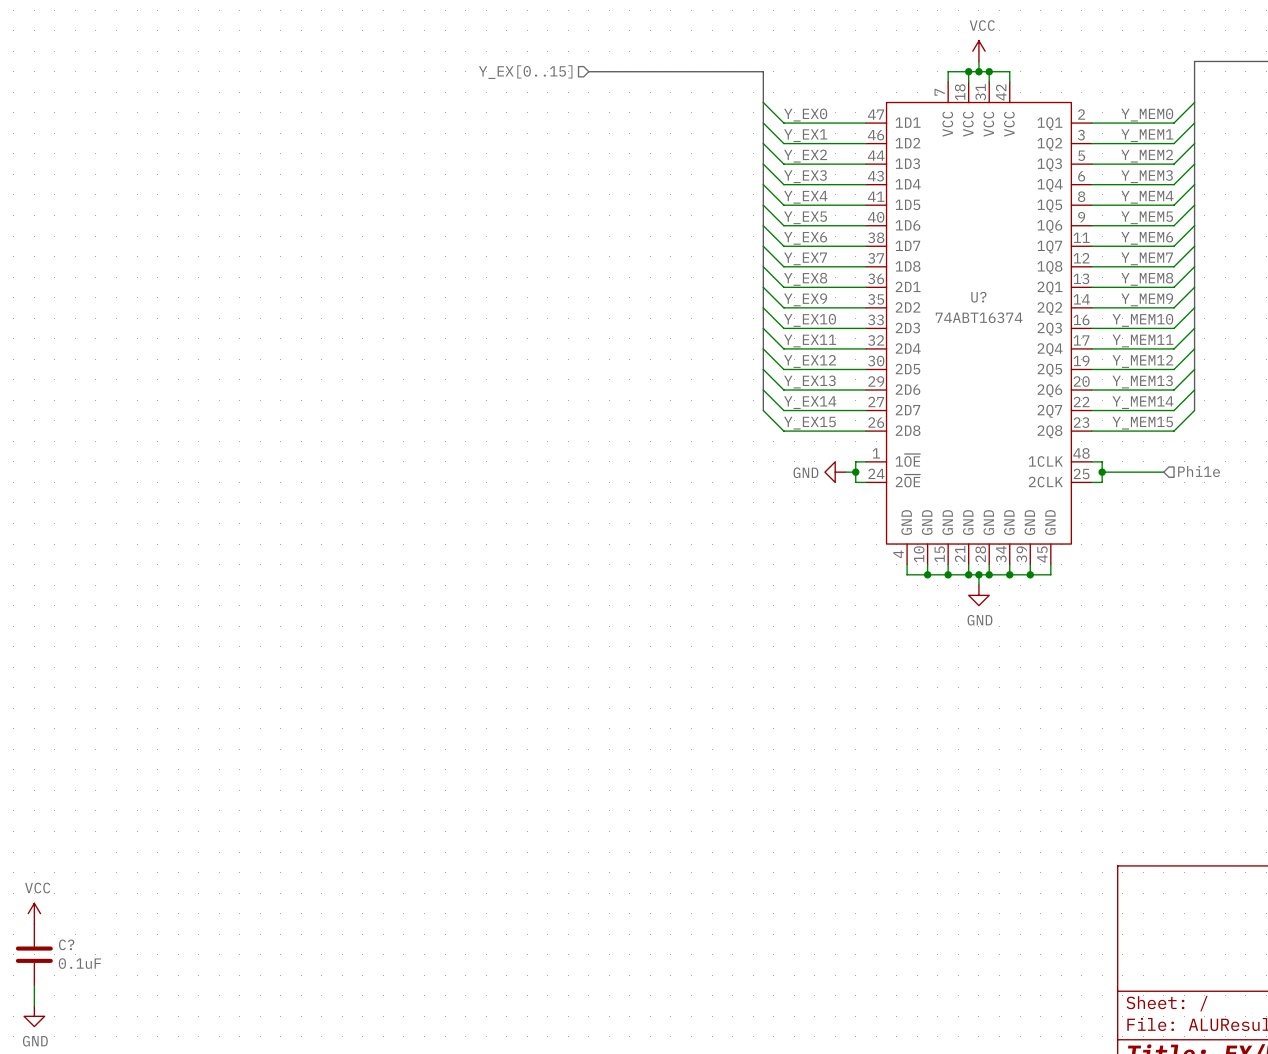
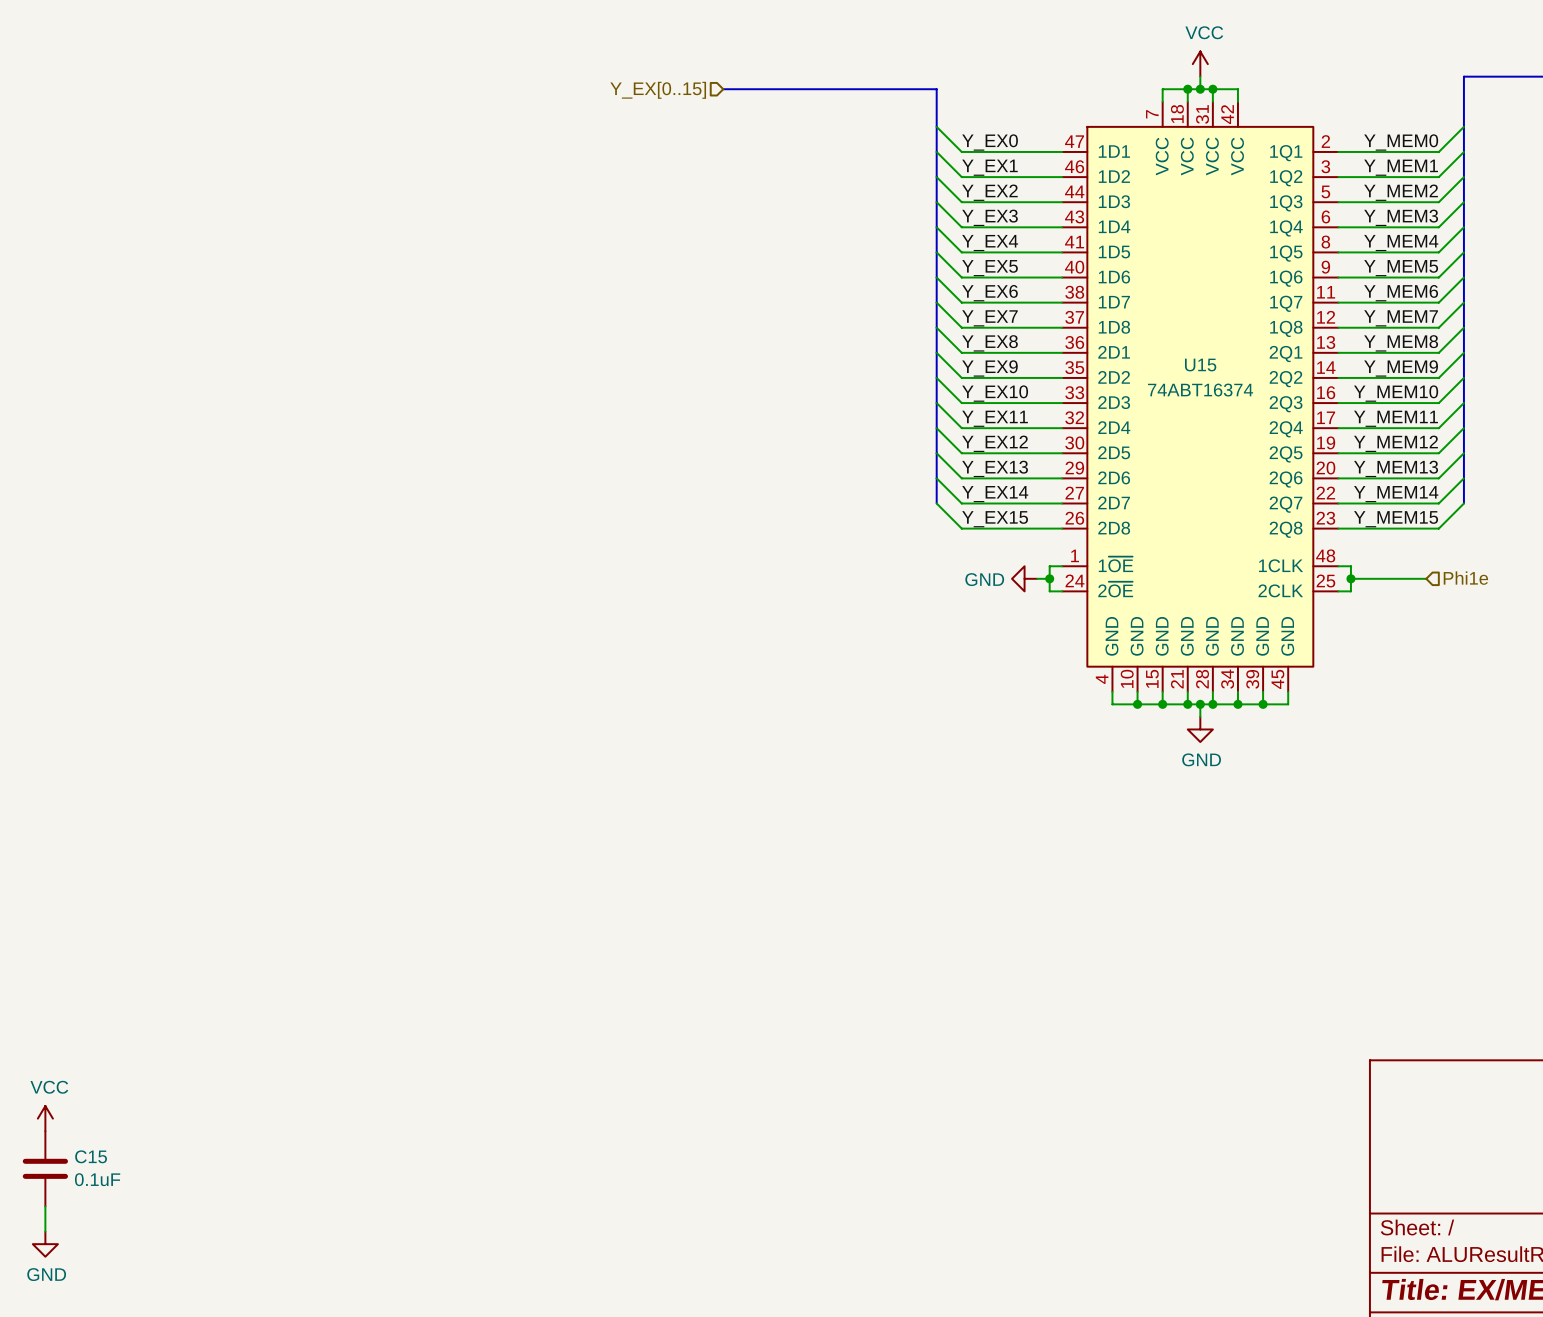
U? name: U? (978, 297) -> U15 (1200, 365)
C? name: C? (66, 944) -> C15 (91, 1156)

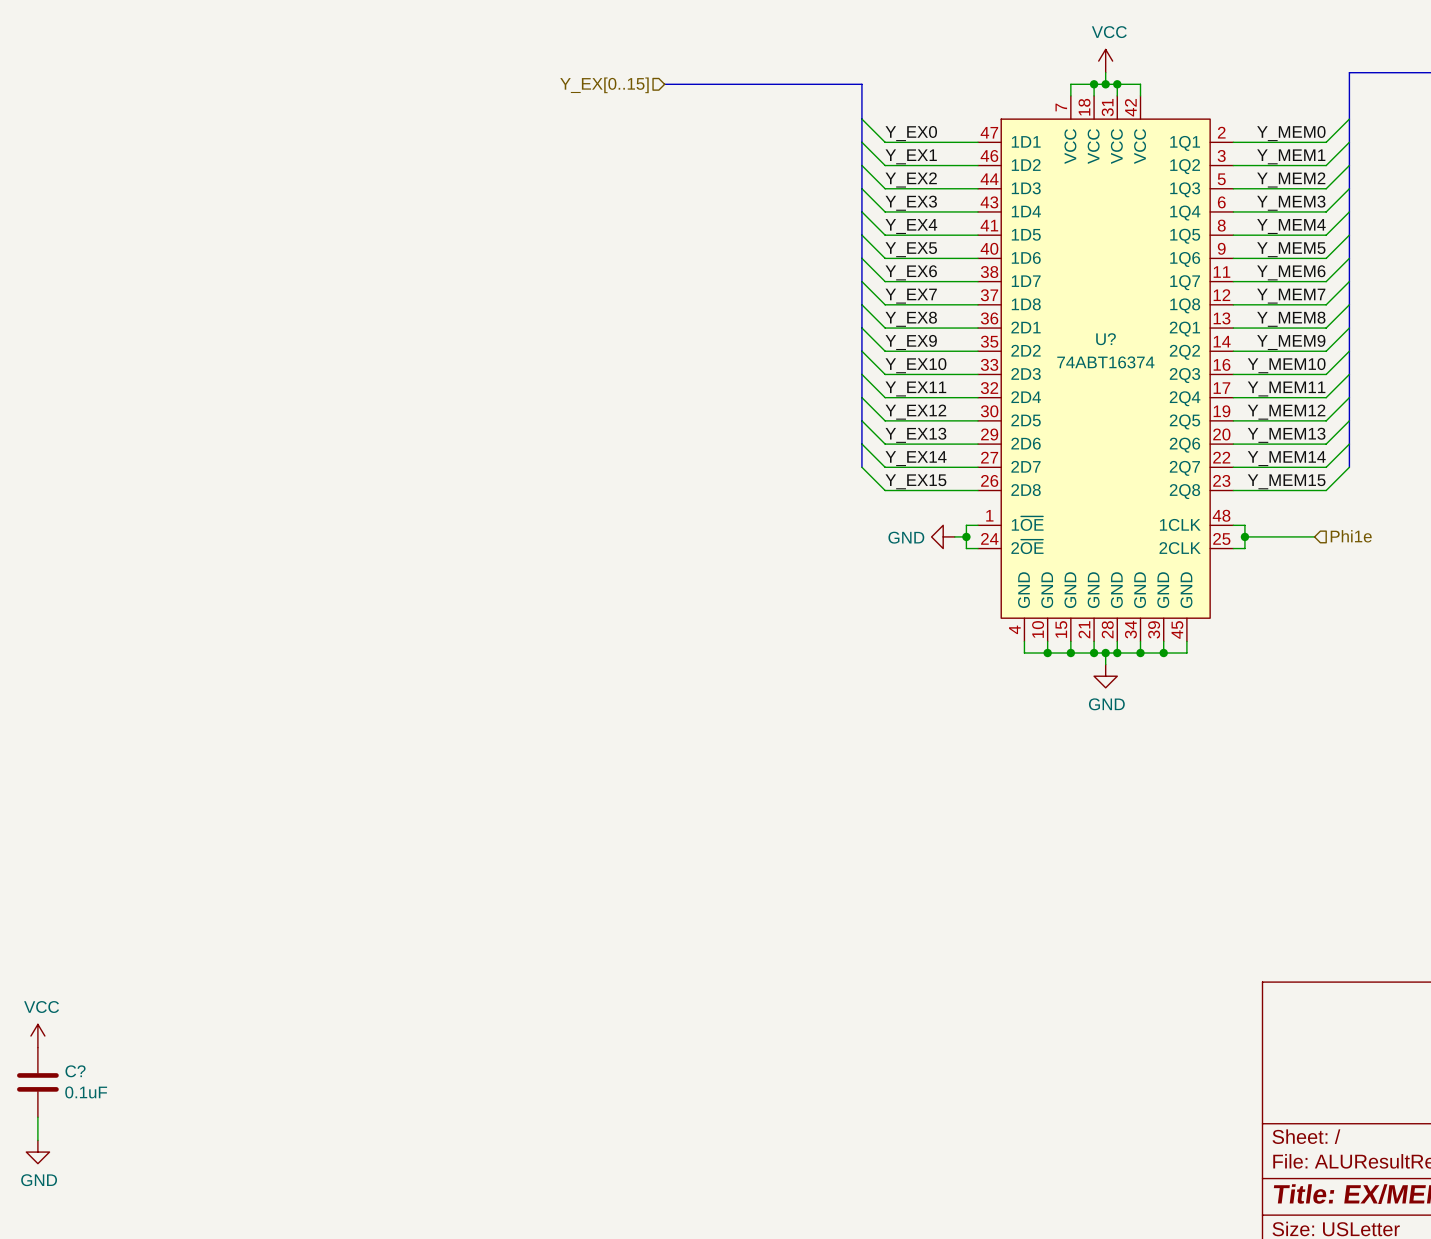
U15 name: U15 (1200, 365) -> U? (1106, 339)
C15 name: C15 (91, 1156) -> C? (75, 1071)

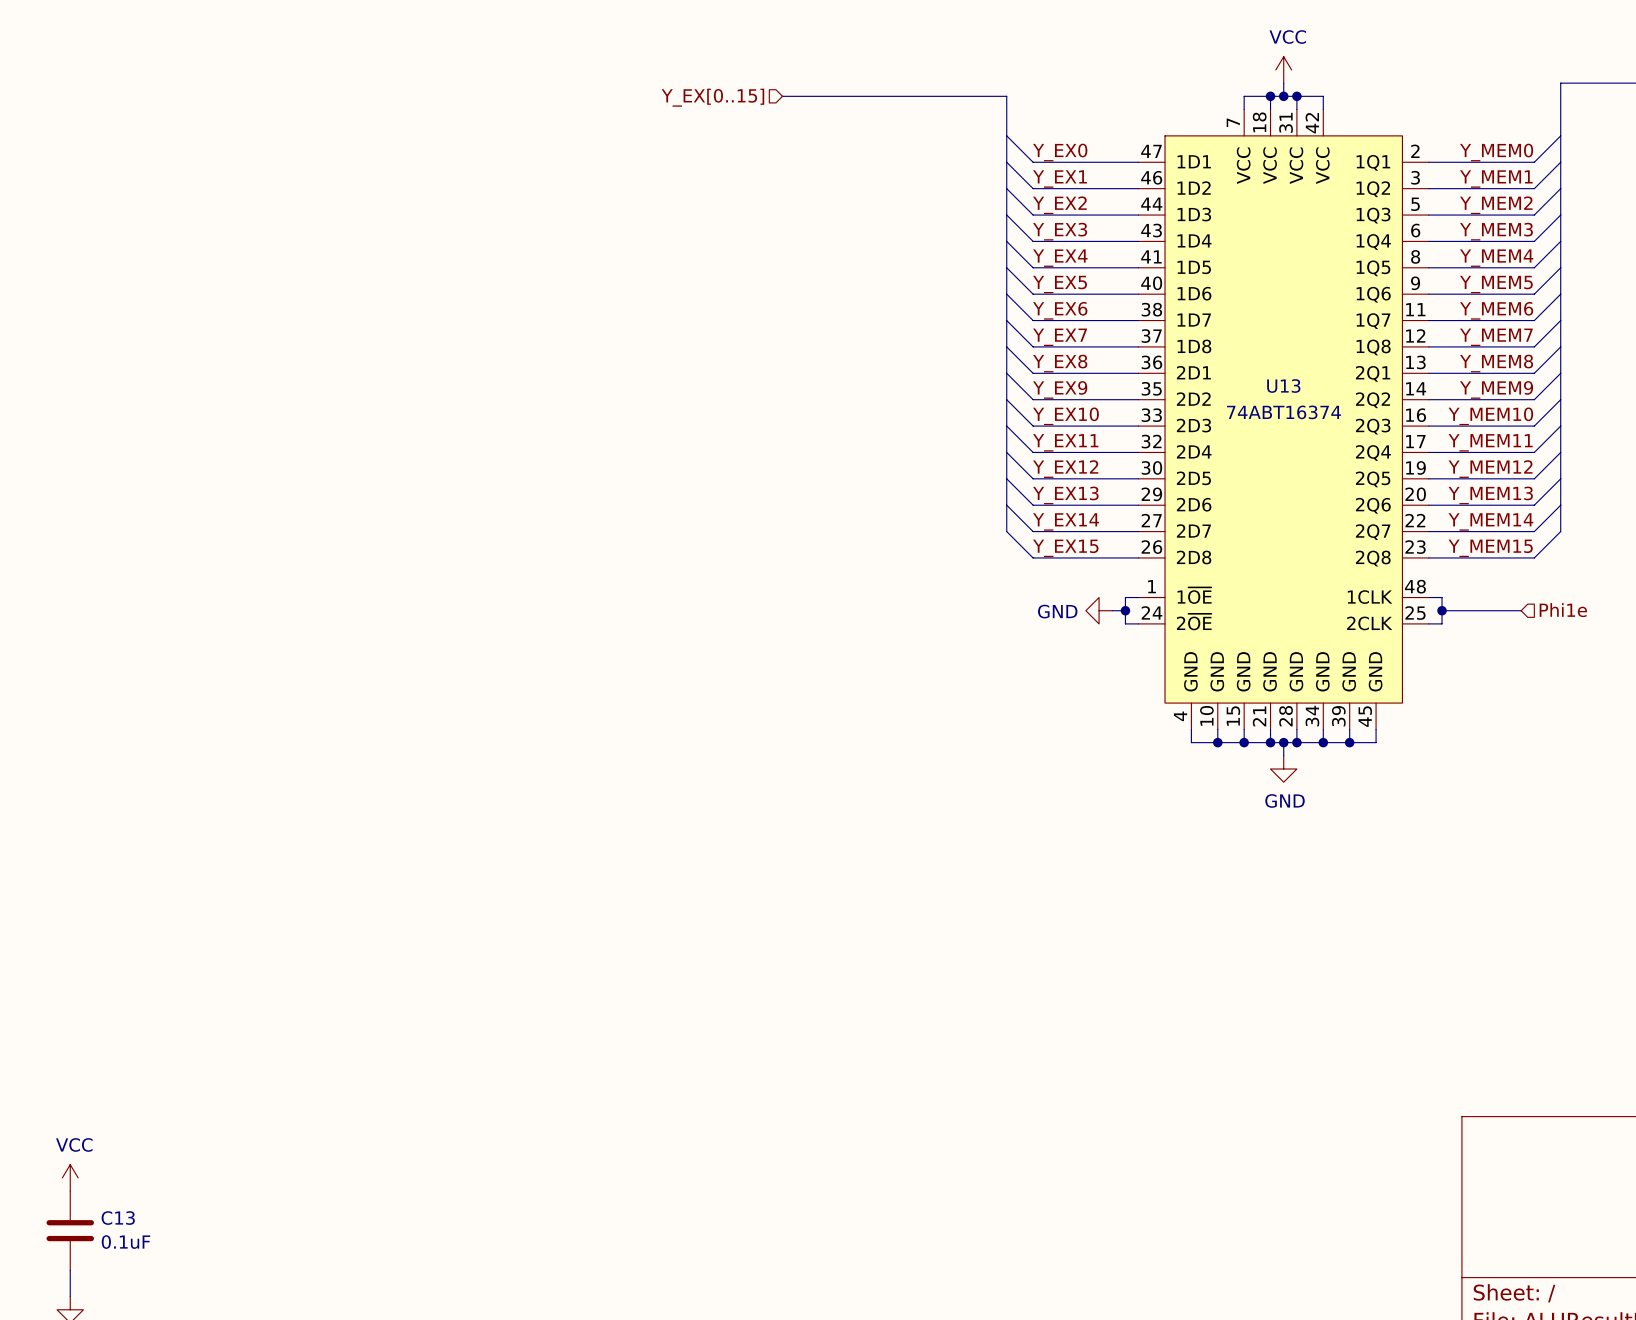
U? name: U? (1106, 339) -> U13 (1283, 386)
C? name: C? (75, 1071) -> C13 (118, 1218)

